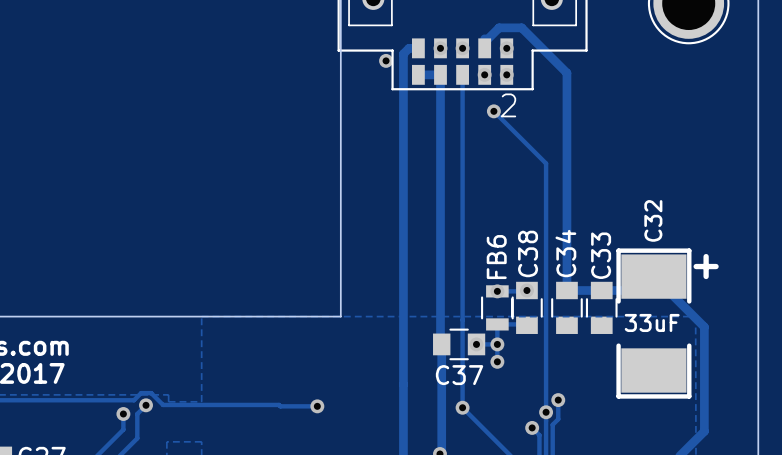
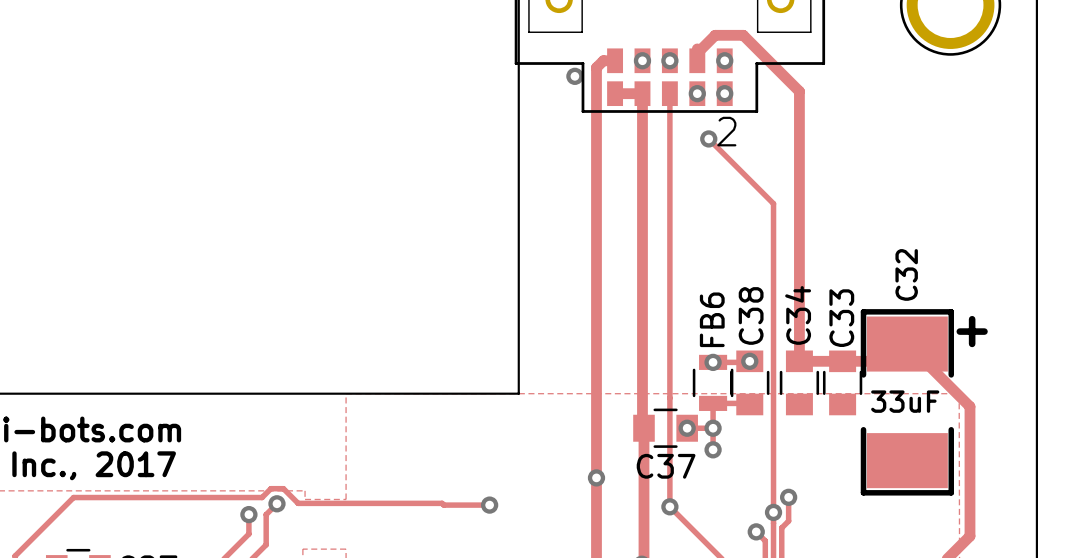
via: none -> (596, 477)

